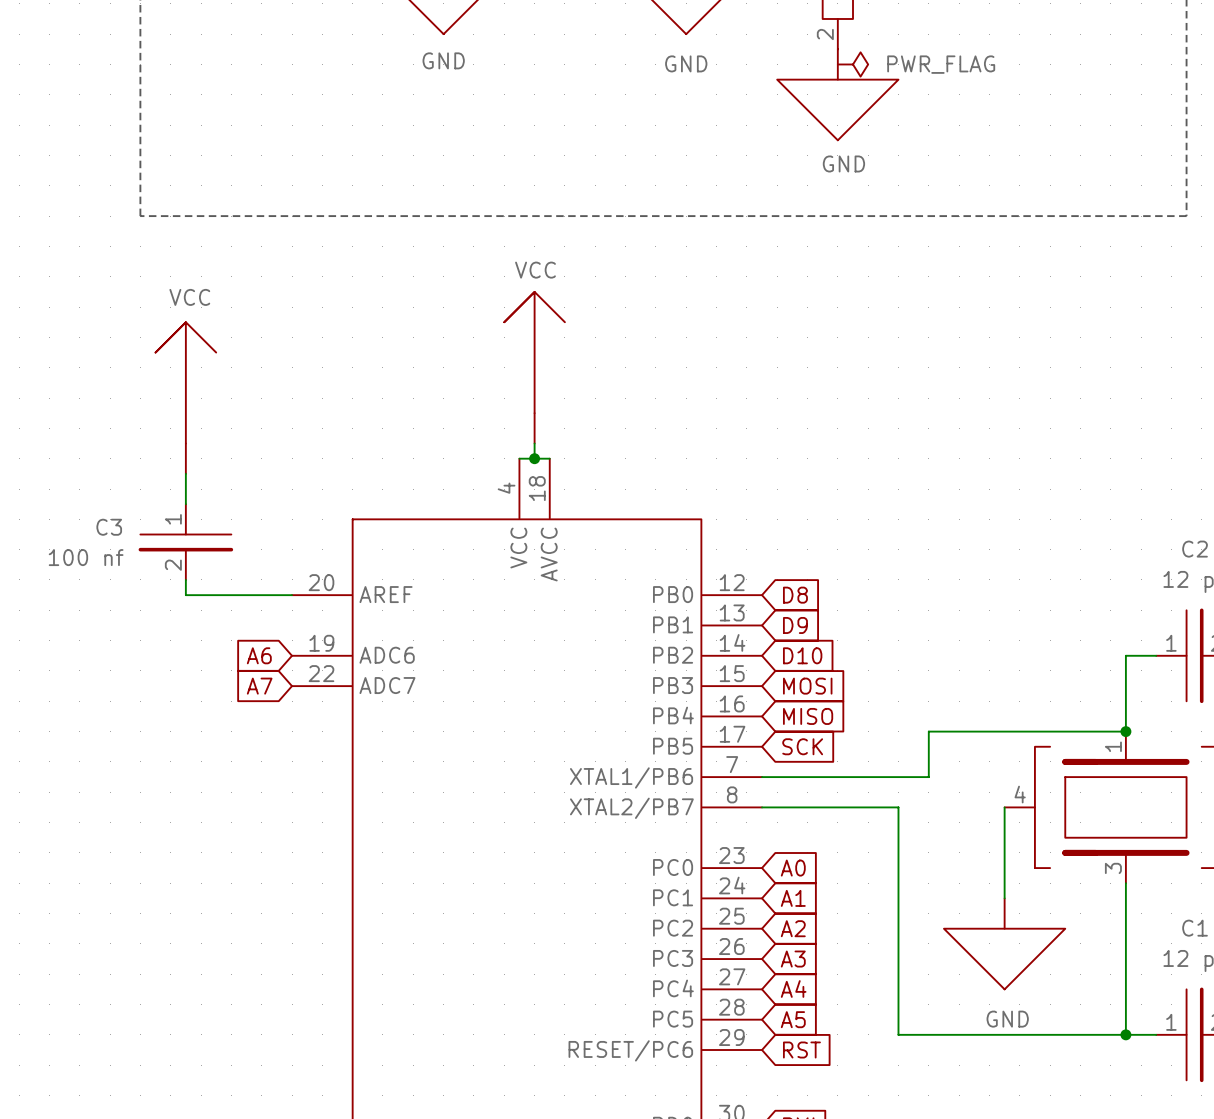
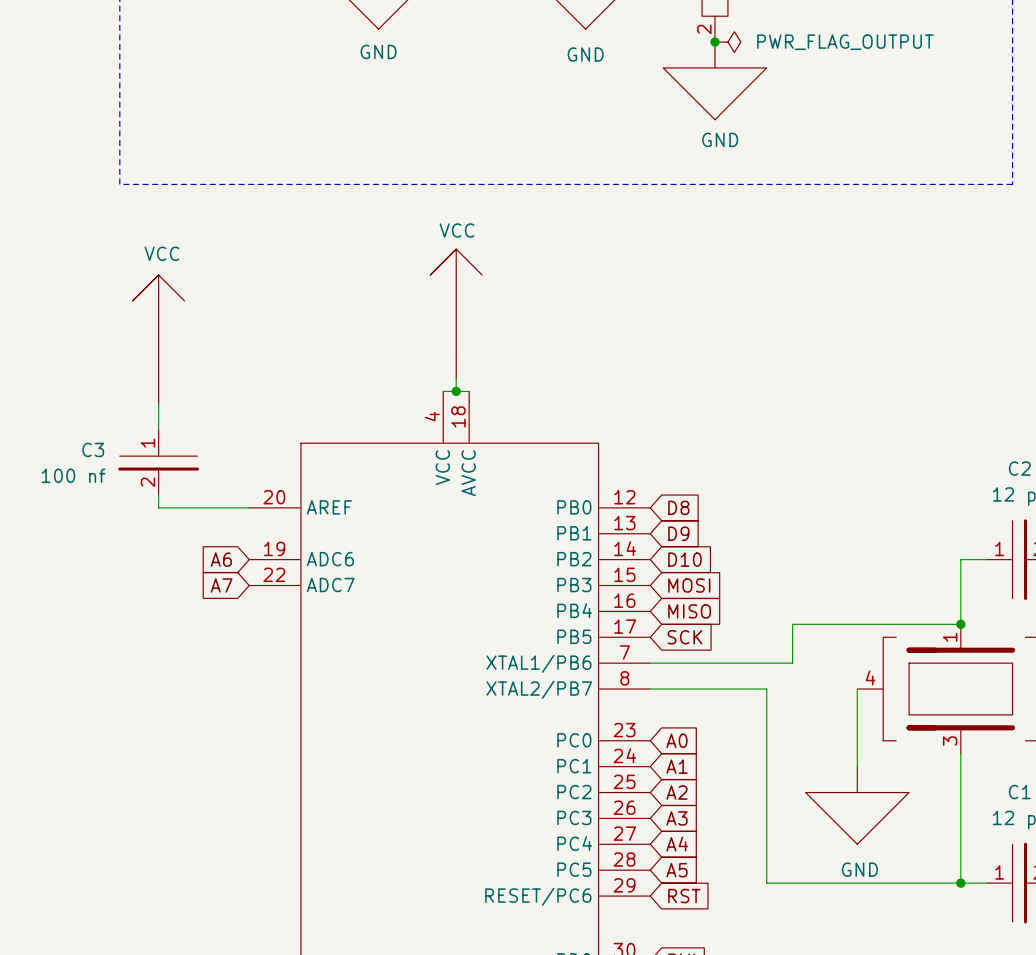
junction: none -> (714, 42)
power symbol: none -> PWR_FLAG_OUTPUT (727, 42)
power symbol: PWR_FLAG (853, 64) -> none

